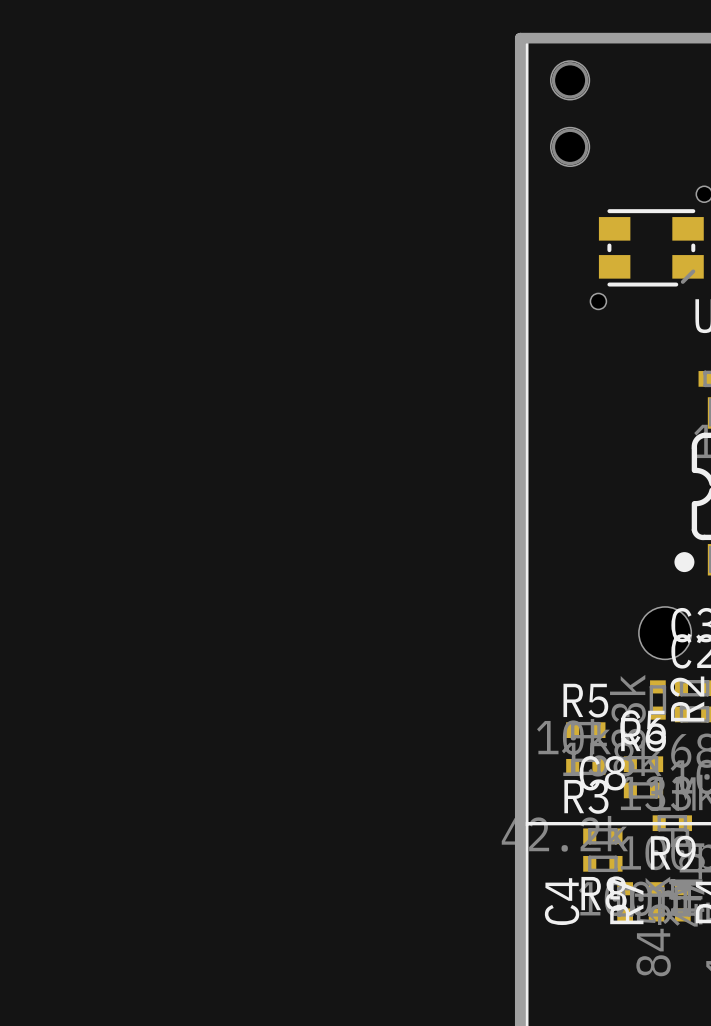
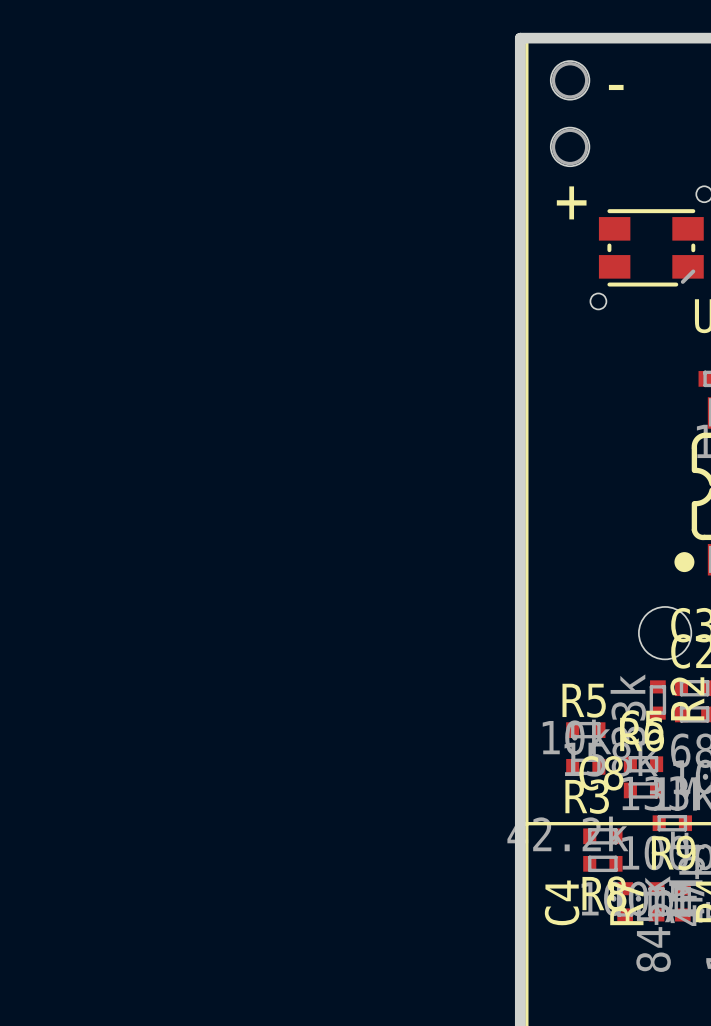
text: none -> - (616, 87)
text: none -> + (571, 202)

